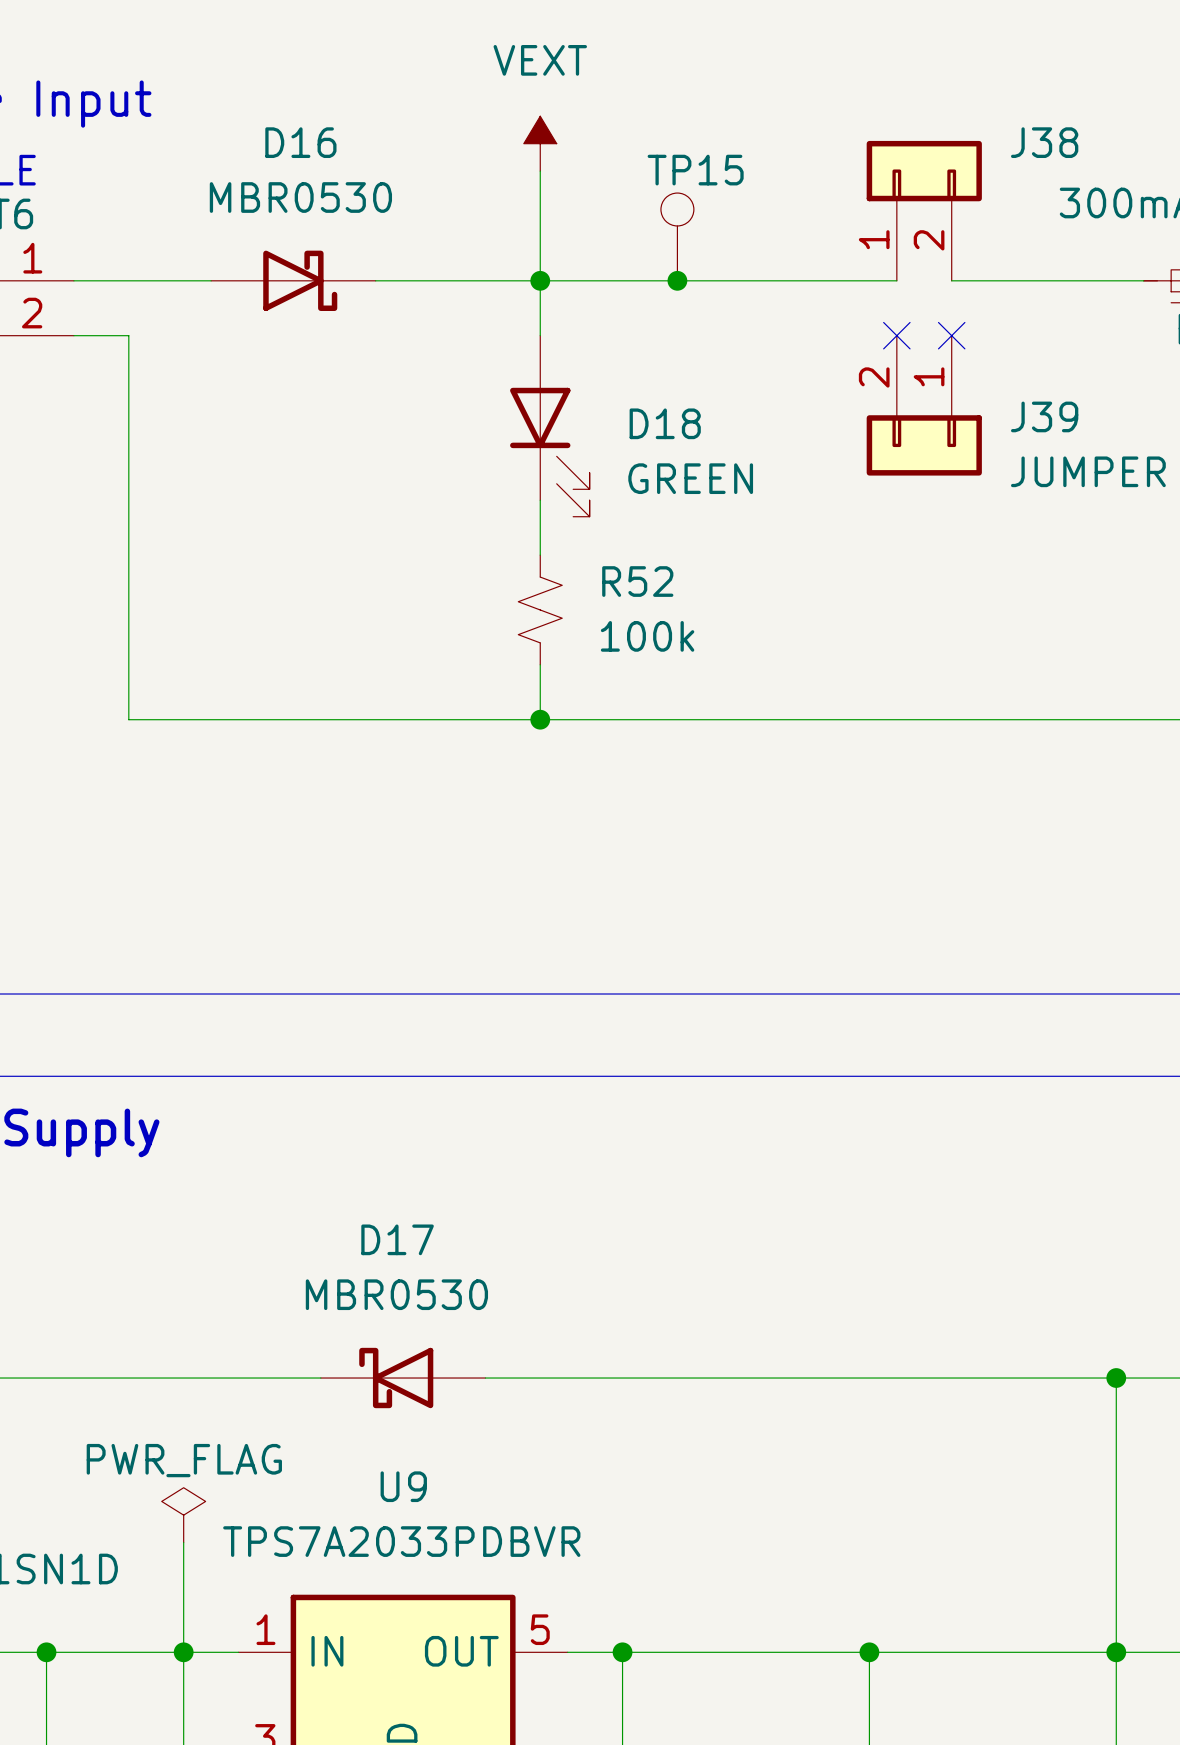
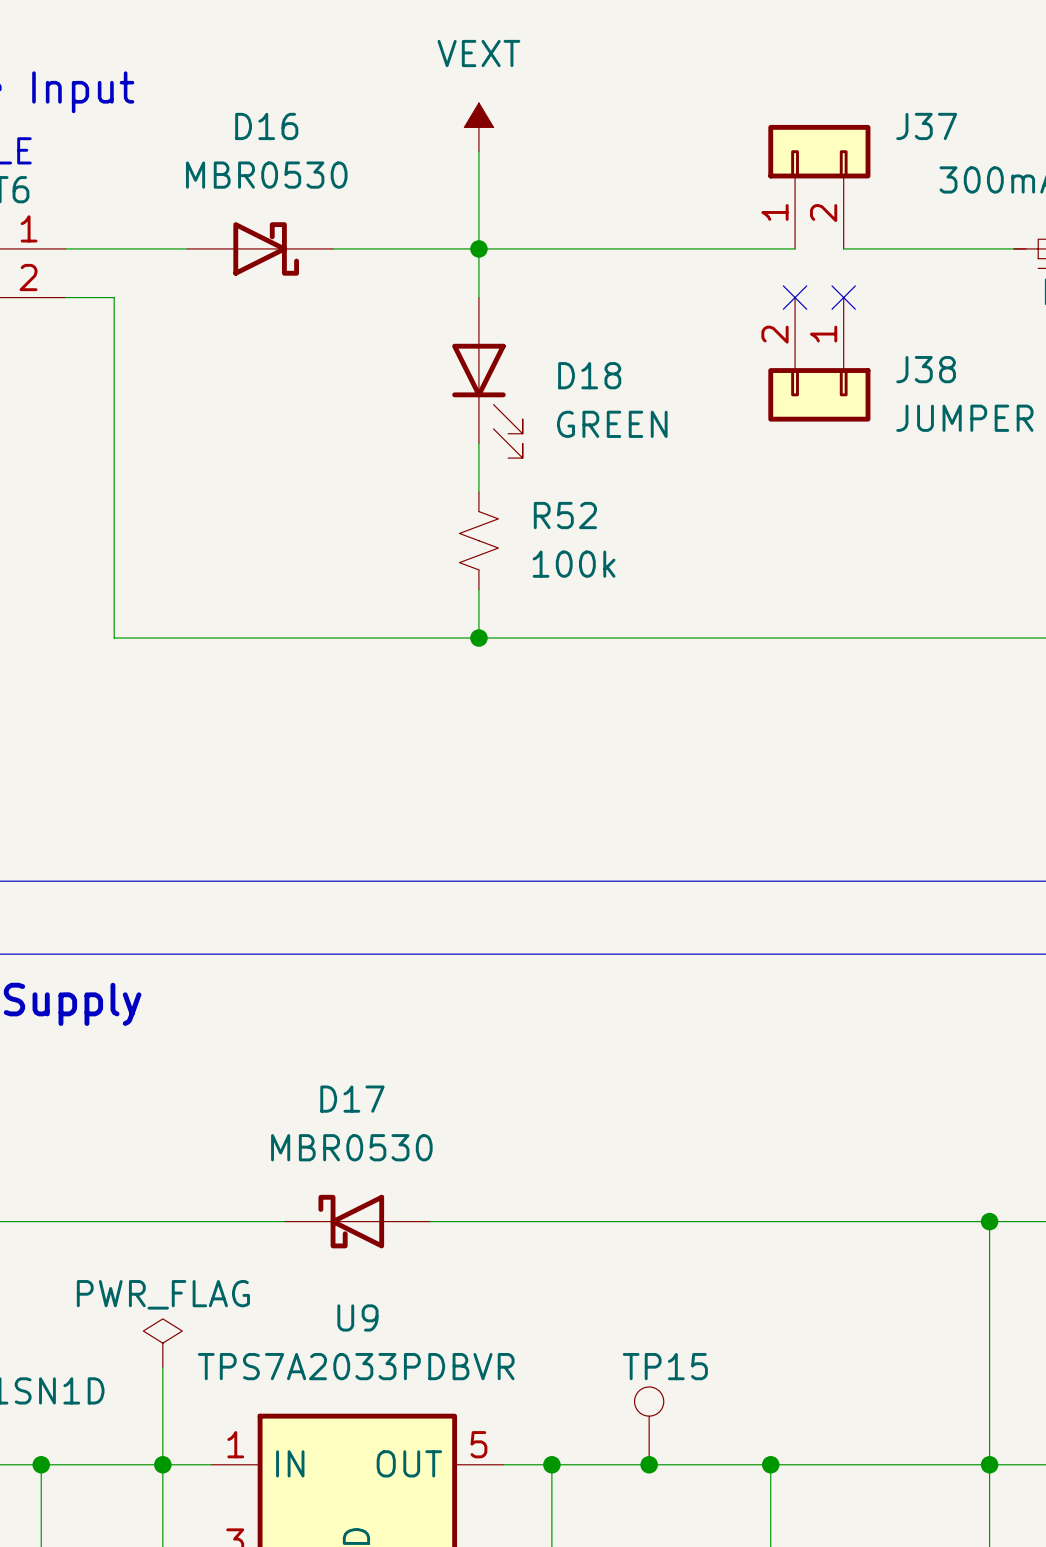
J38 name: J38 (1044, 142) -> J37 (926, 126)
TP15 position: (677, 236) -> (649, 1425)
junction: (677, 280) -> none
J39 name: J39 (1044, 416) -> J38 (926, 369)
junction: none -> (649, 1464)

